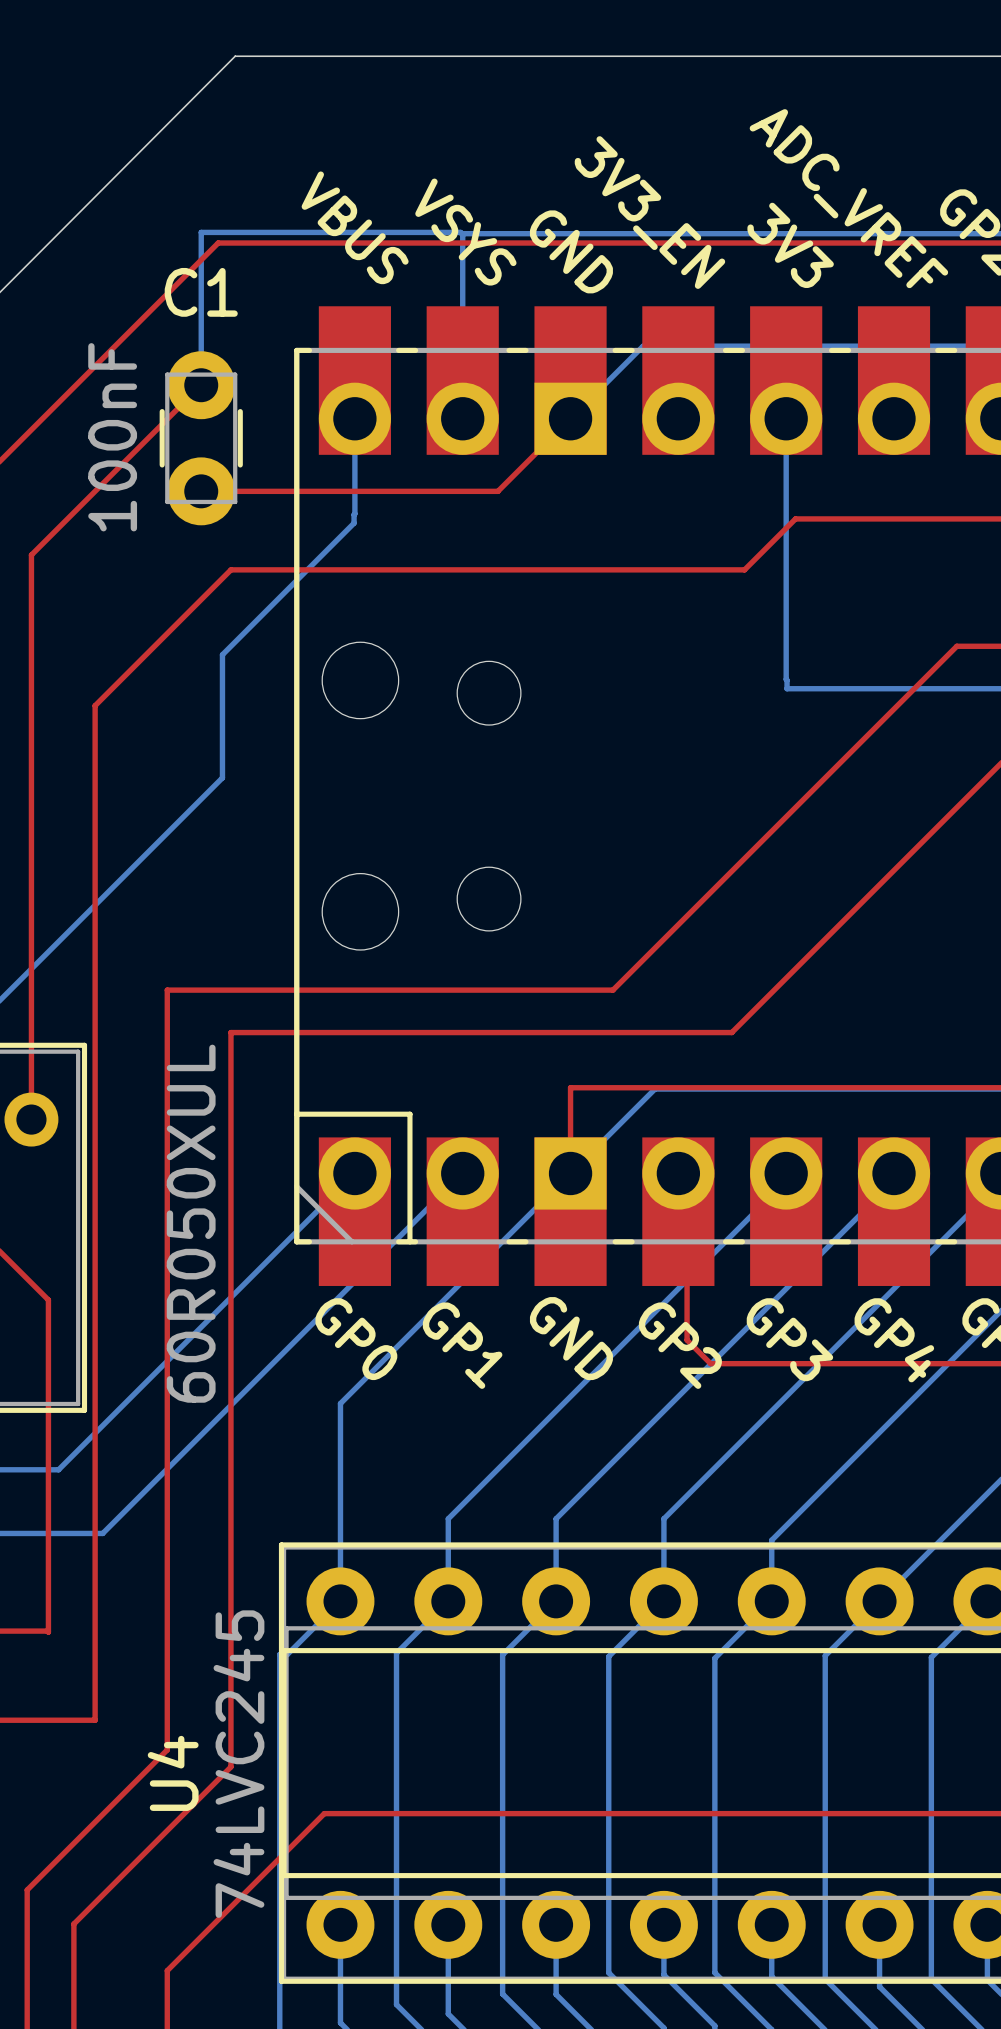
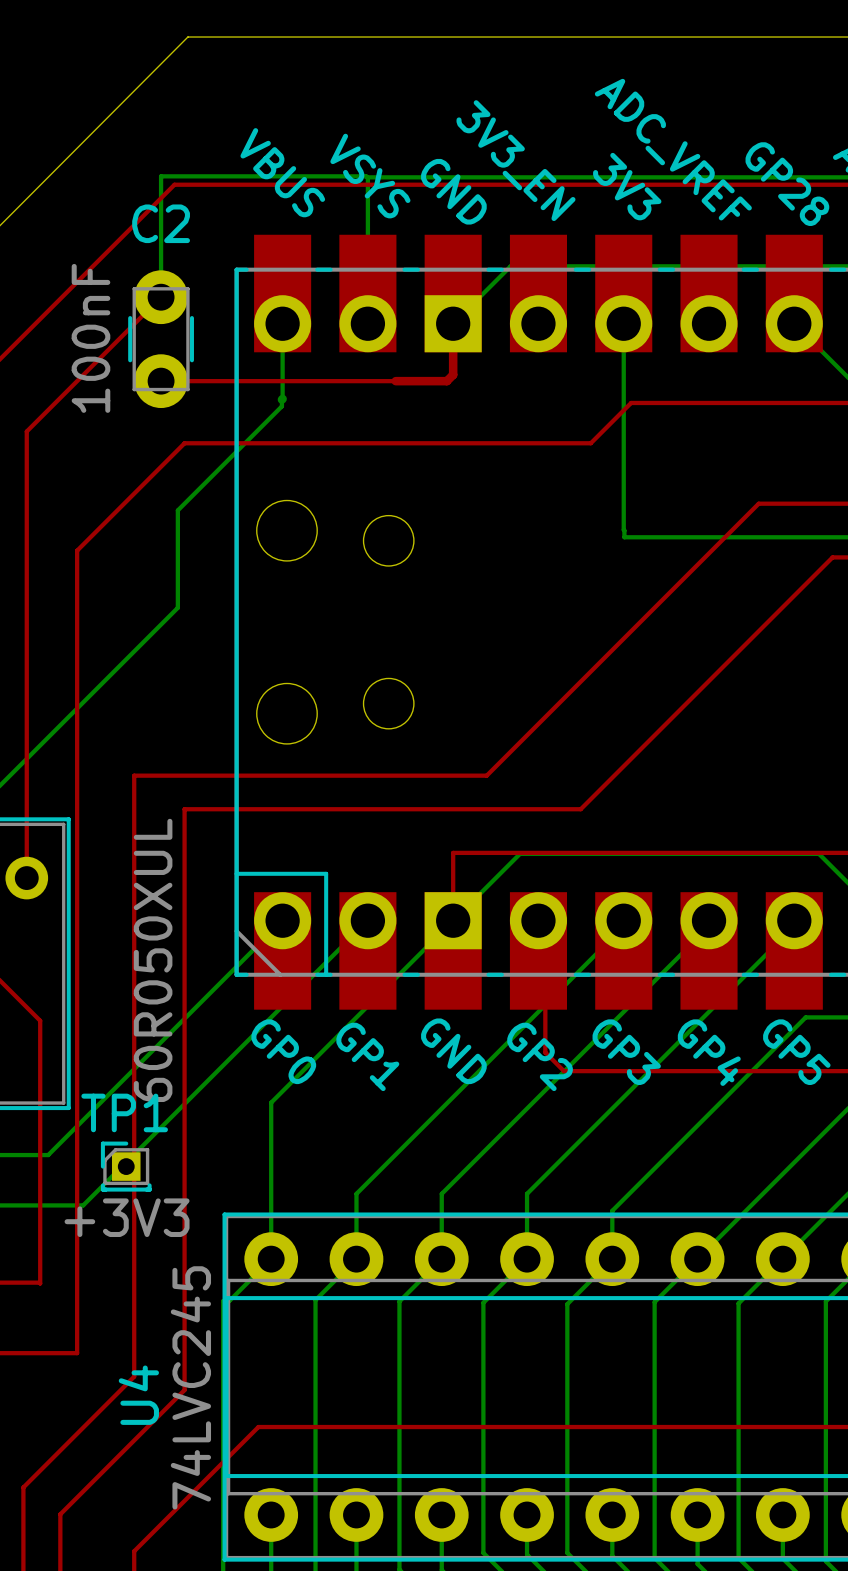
C1 name: C1 (201, 292) -> C2 (161, 223)
top track: (570, 418) (497, 491) -> (453, 323) (453, 374) (446, 381) (395, 381)
TP1: none -> +3V3 (126, 1166)

